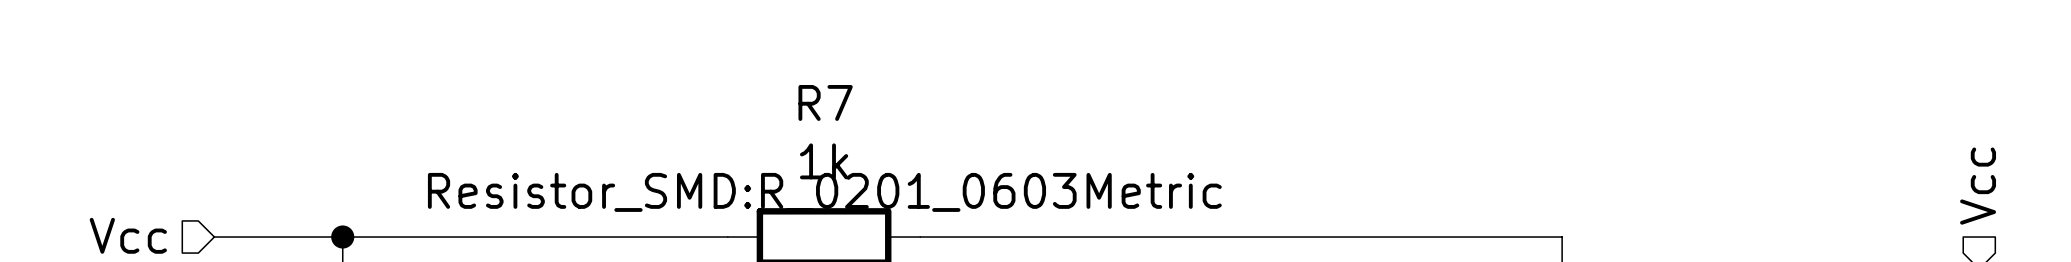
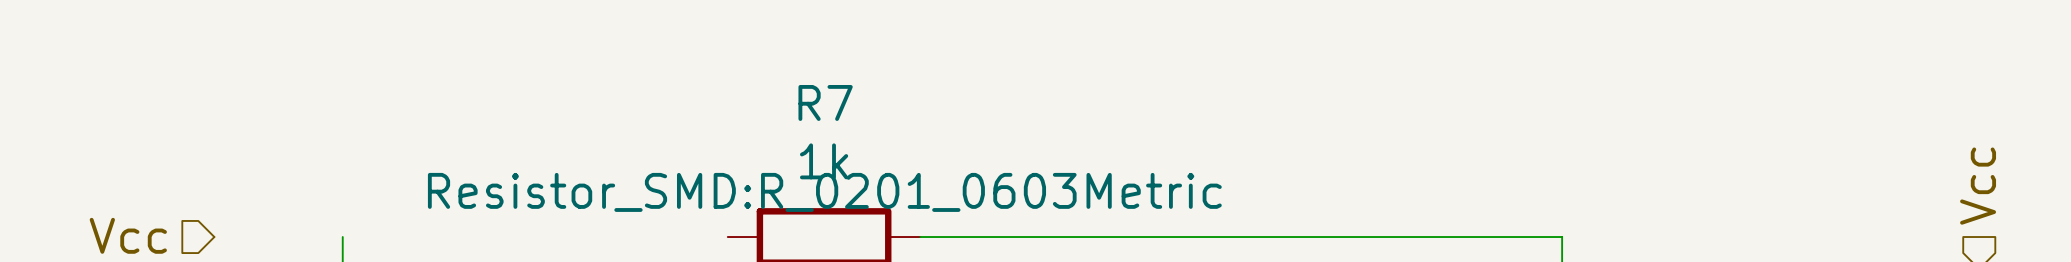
wire: (214, 237) (727, 237) -> none
junction: (342, 237) -> none

